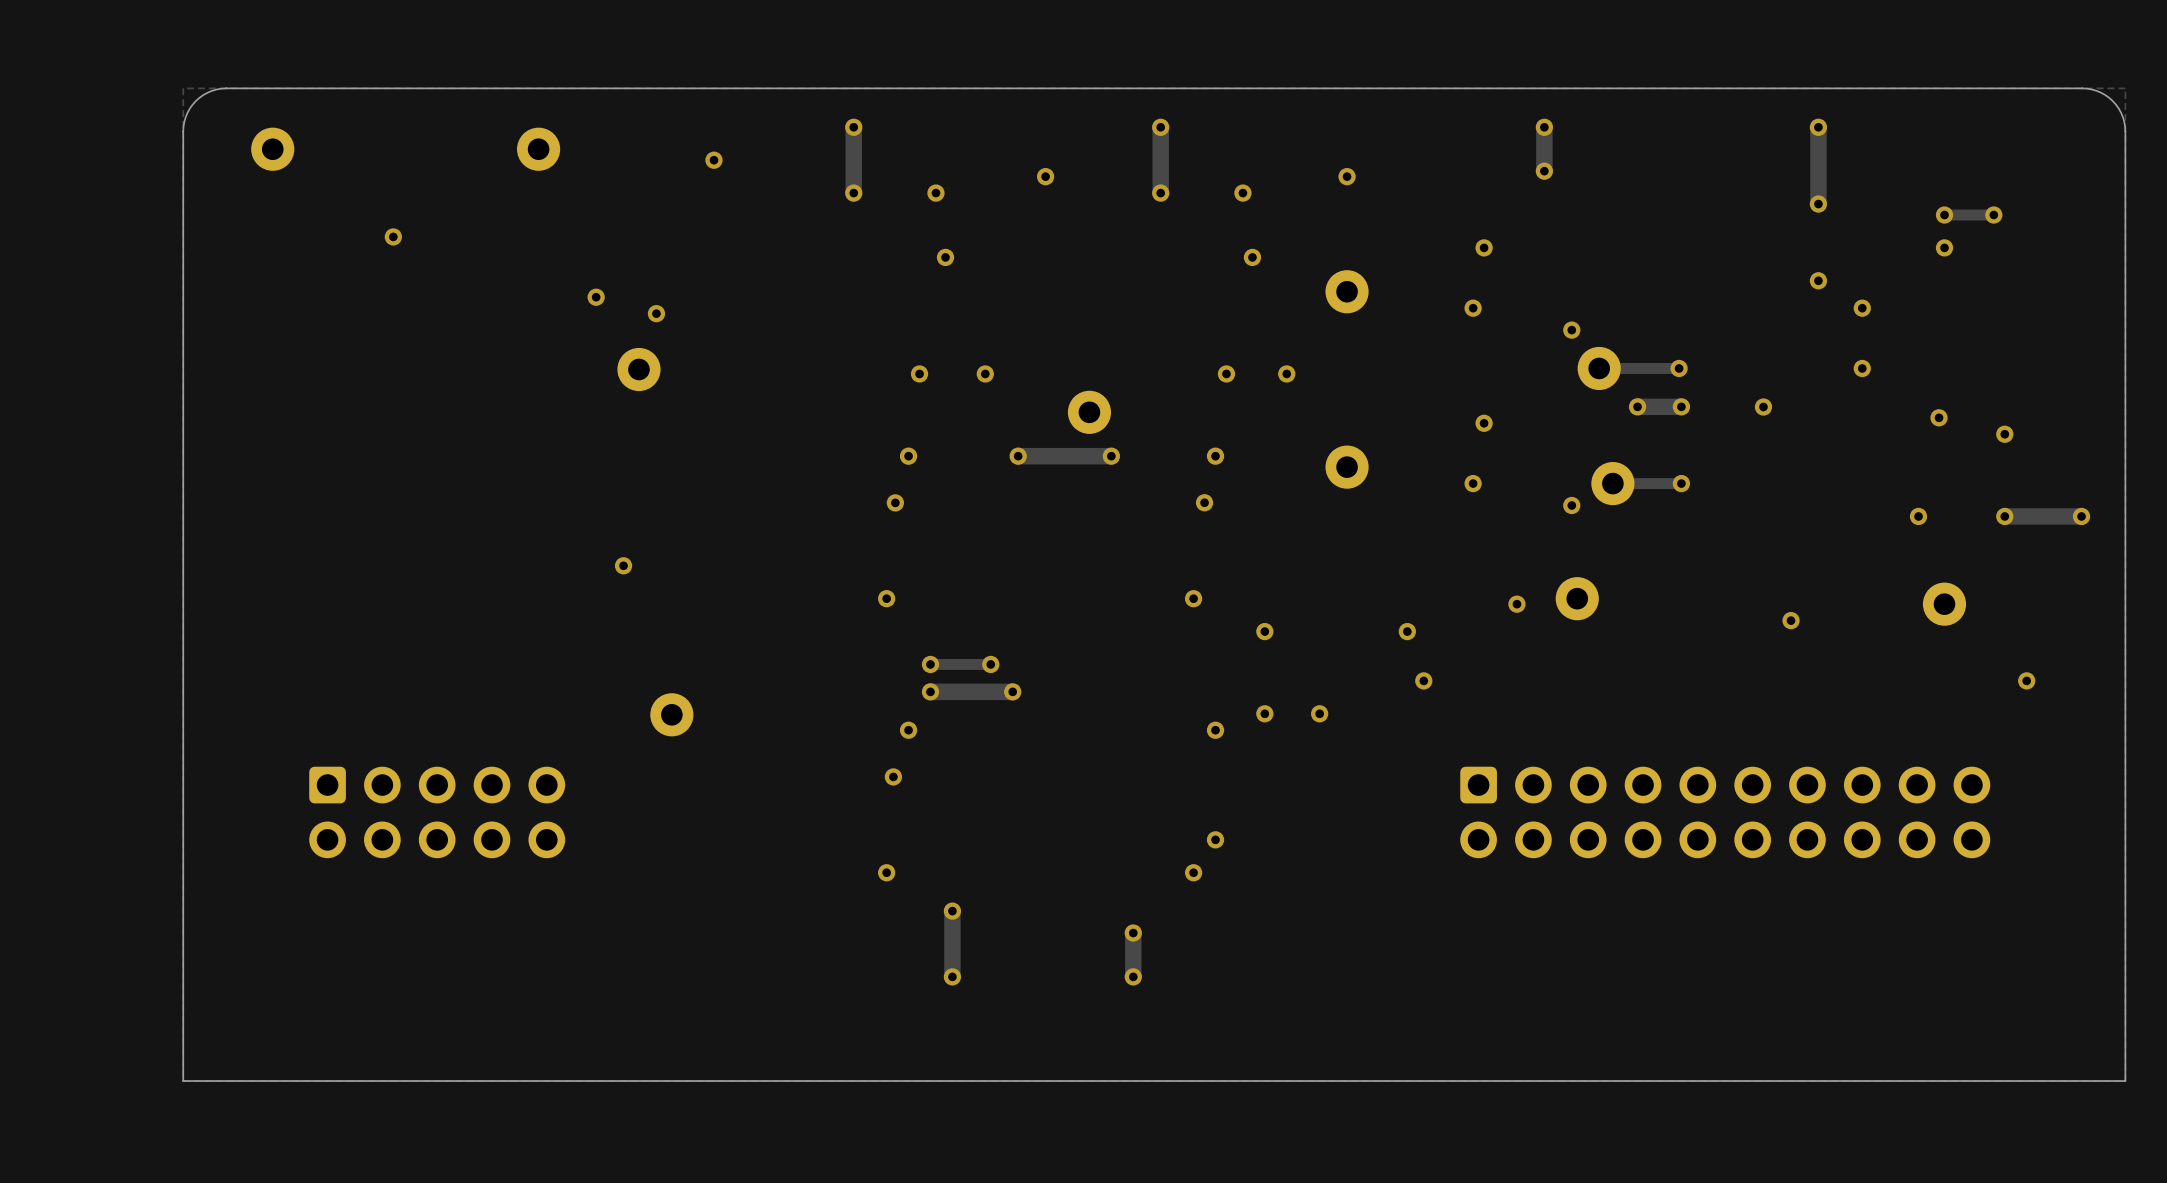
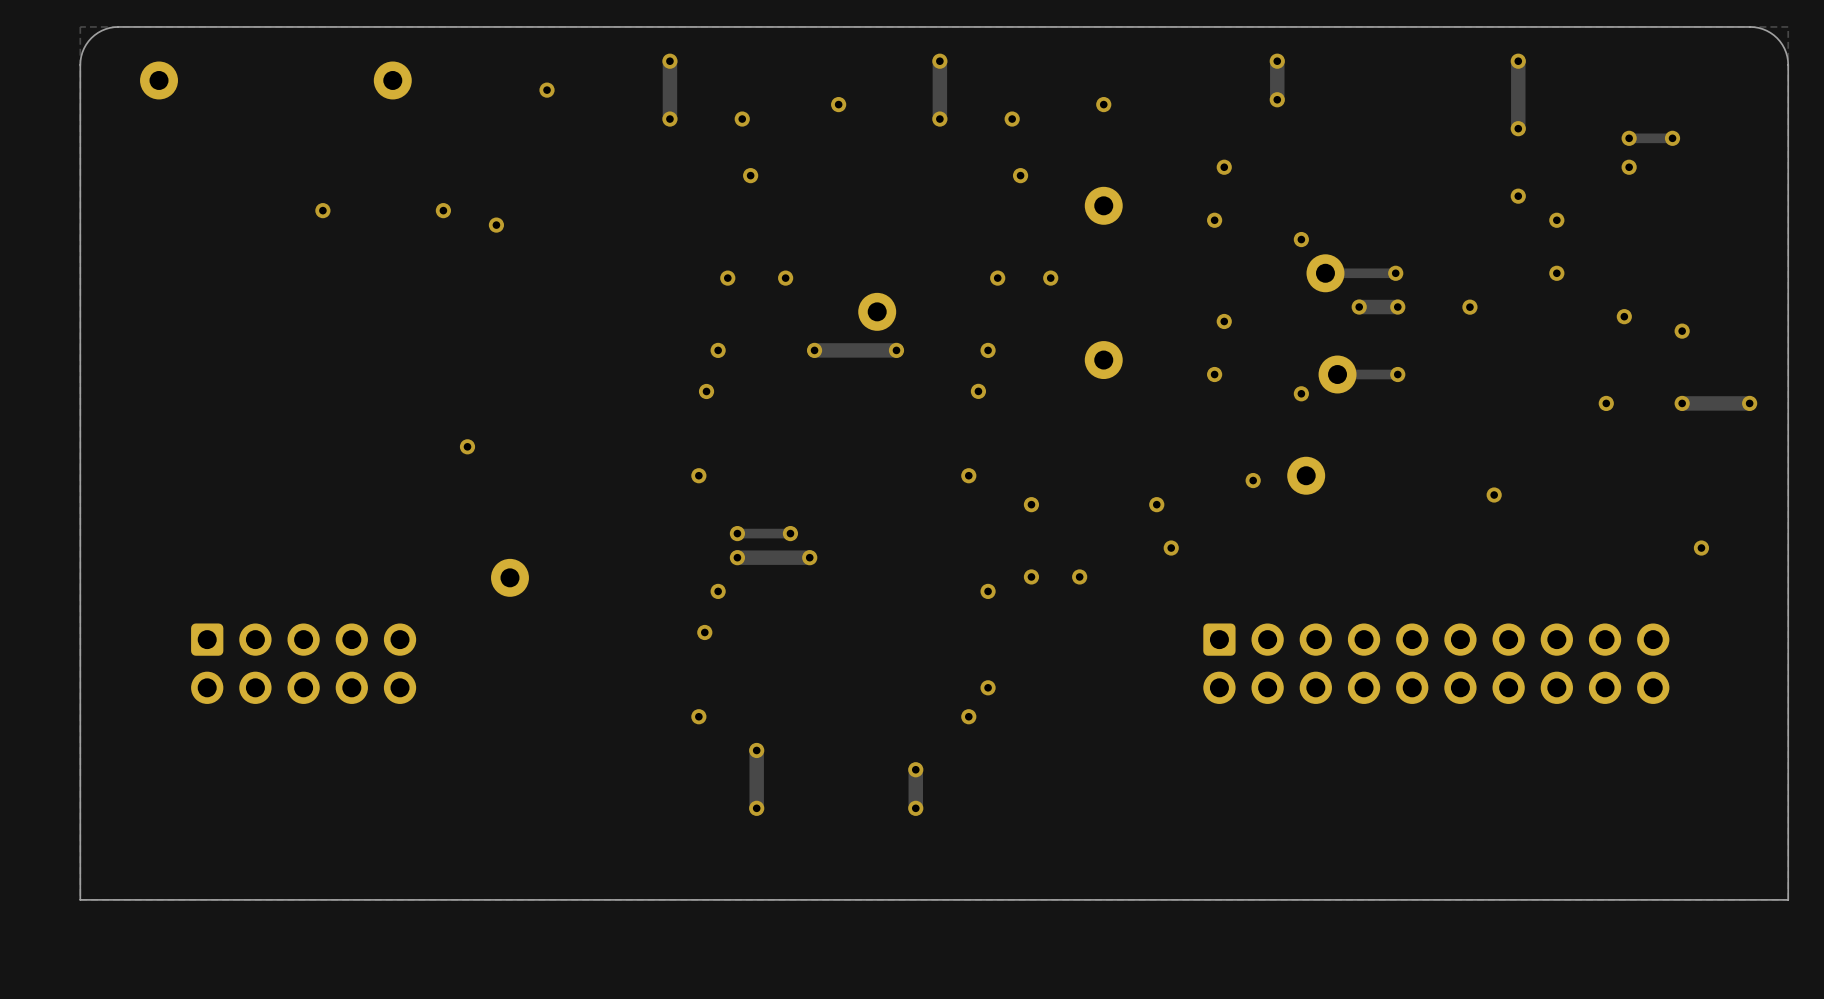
via position: (393, 236) -> (322, 210)
part: (638, 369) -> none
part: (1944, 604) -> none

